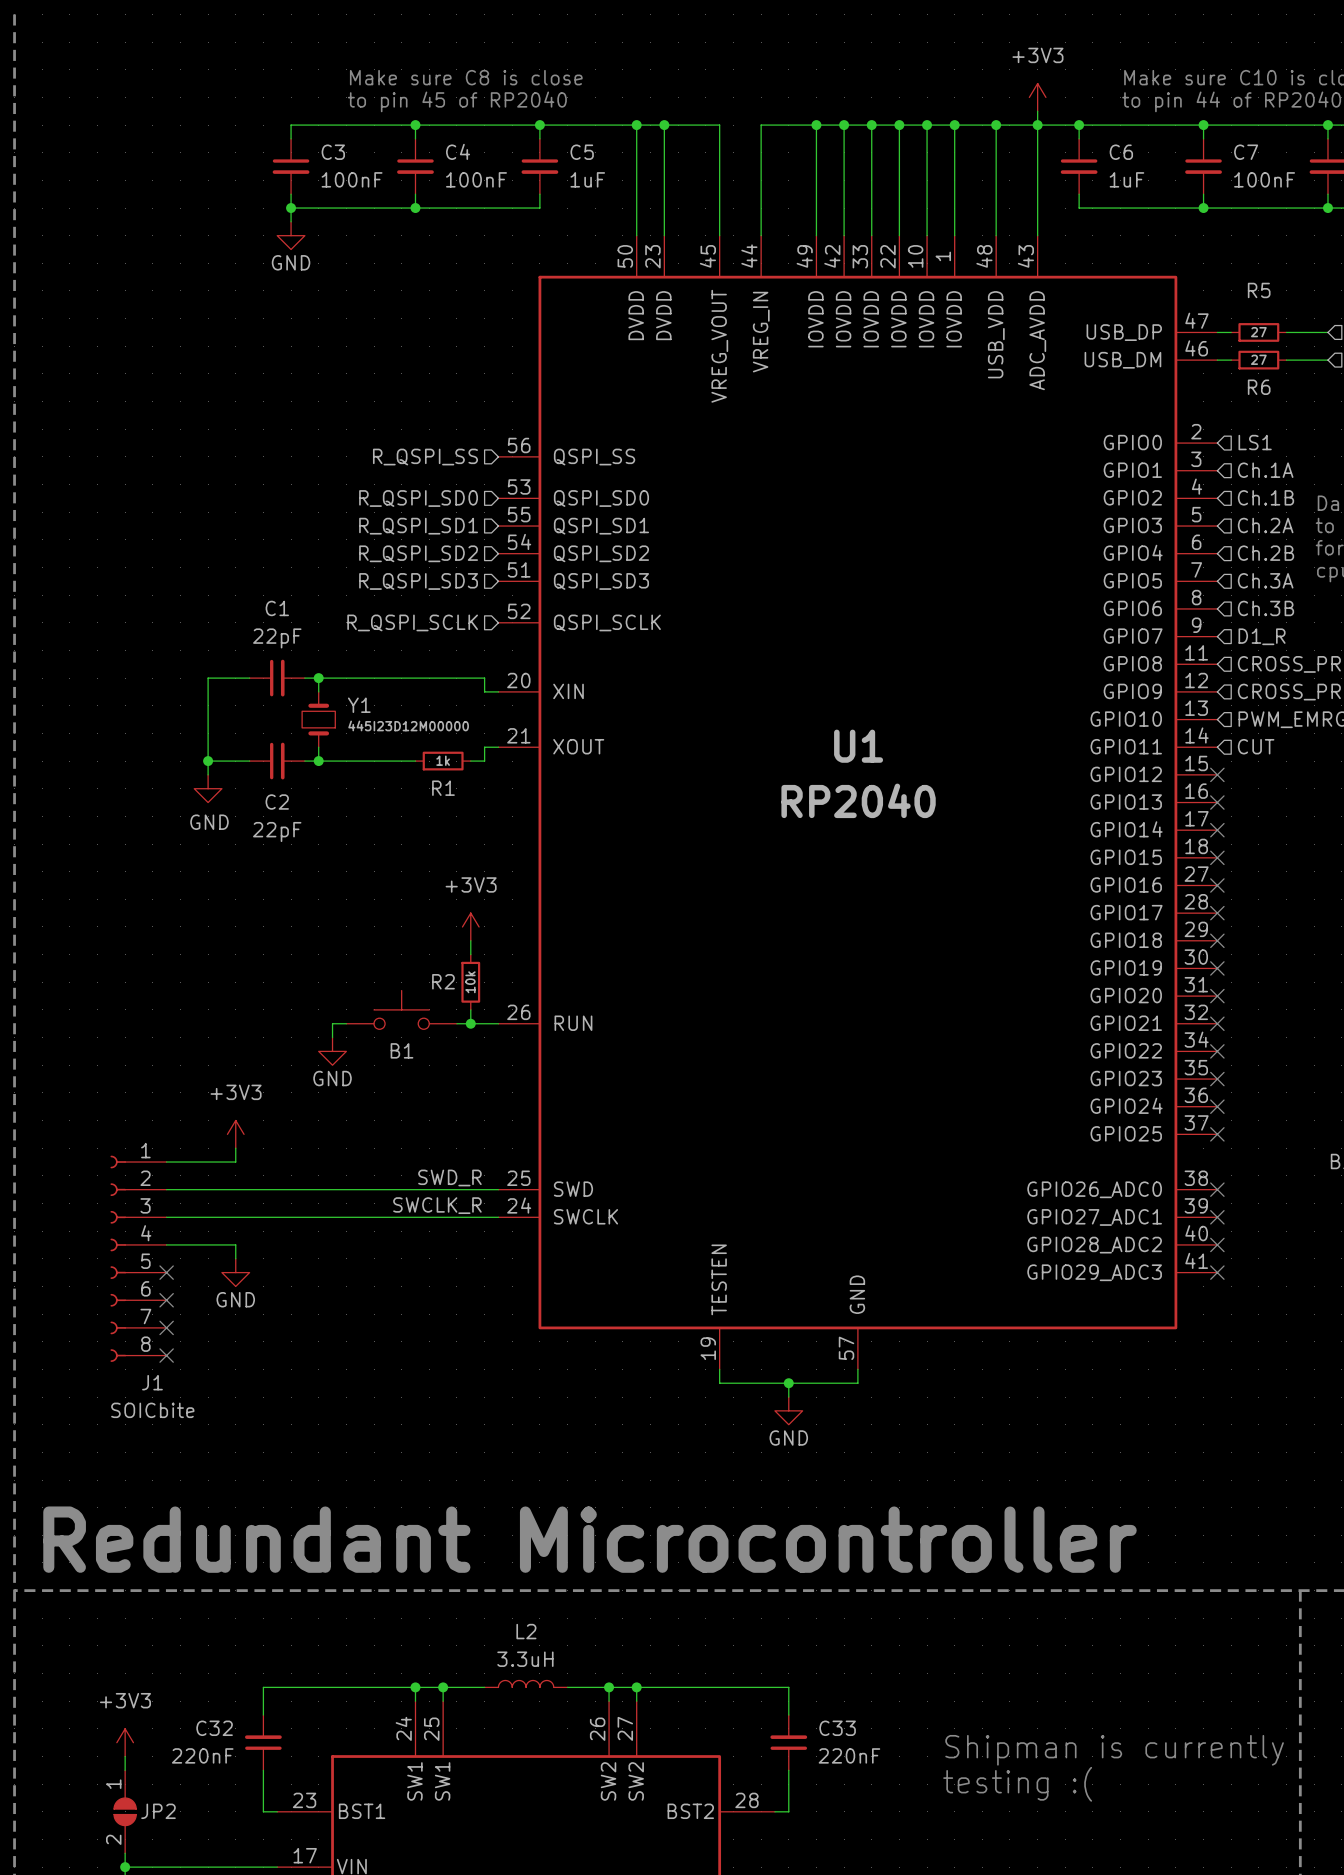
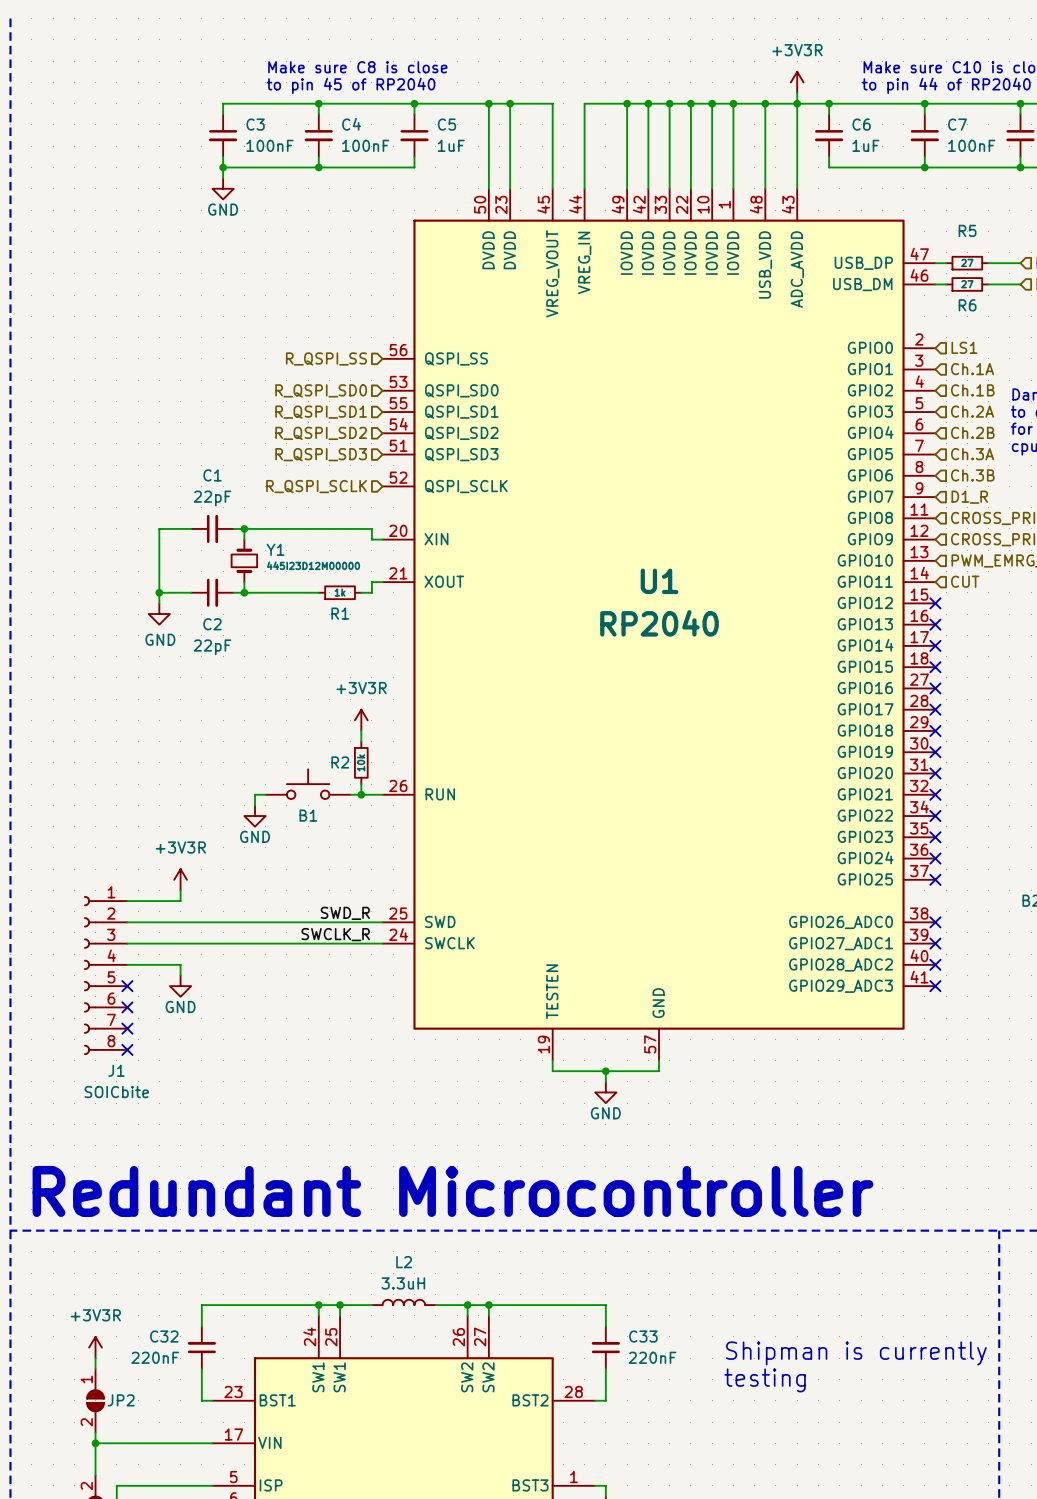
power symbol: +3V3 (1037, 97) -> +3V3R (797, 82)
power symbol: +3V3 (470, 926) -> +3V3R (361, 720)
power symbol: +3V3 (235, 1134) -> +3V3R (180, 879)
power symbol: +3V3 (125, 1742) -> +3V3R (95, 1347)
text: testing :( (1017, 1784) -> testing (765, 1380)

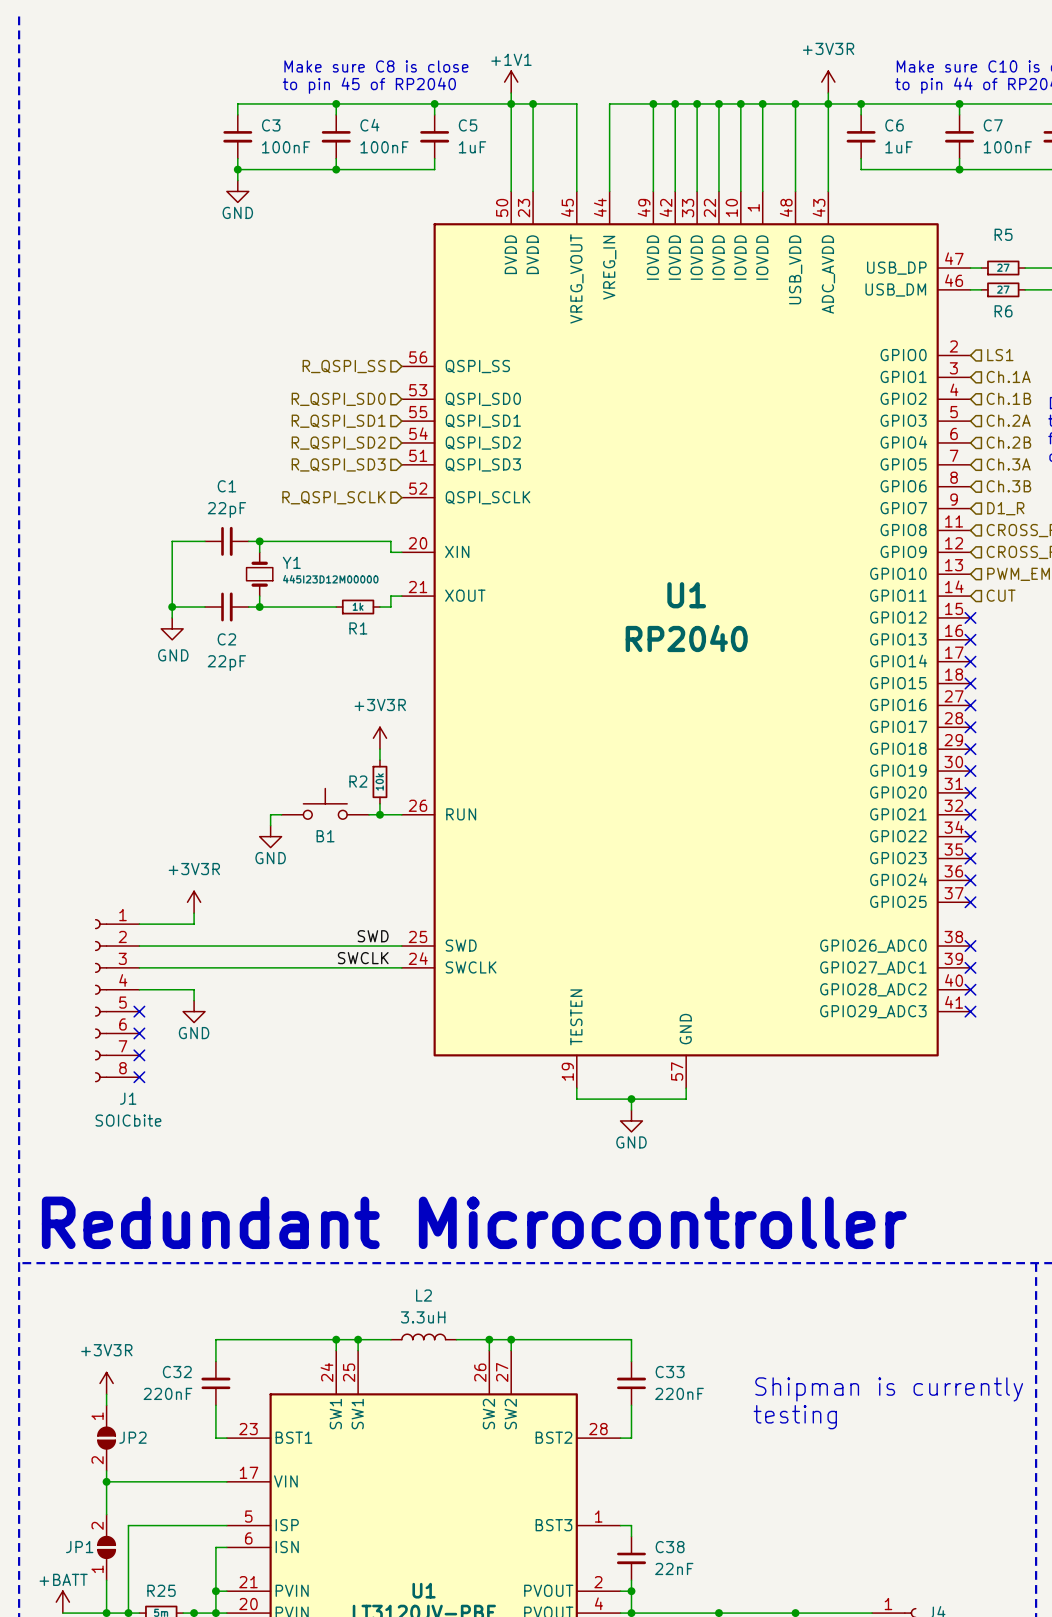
power symbol: none -> +1V1 (511, 82)
wire: none -> (511, 93) (511, 103)
label: SWD_R (345, 913) -> SWD (373, 936)
label: SWCLK_R (335, 934) -> SWCLK (363, 958)

